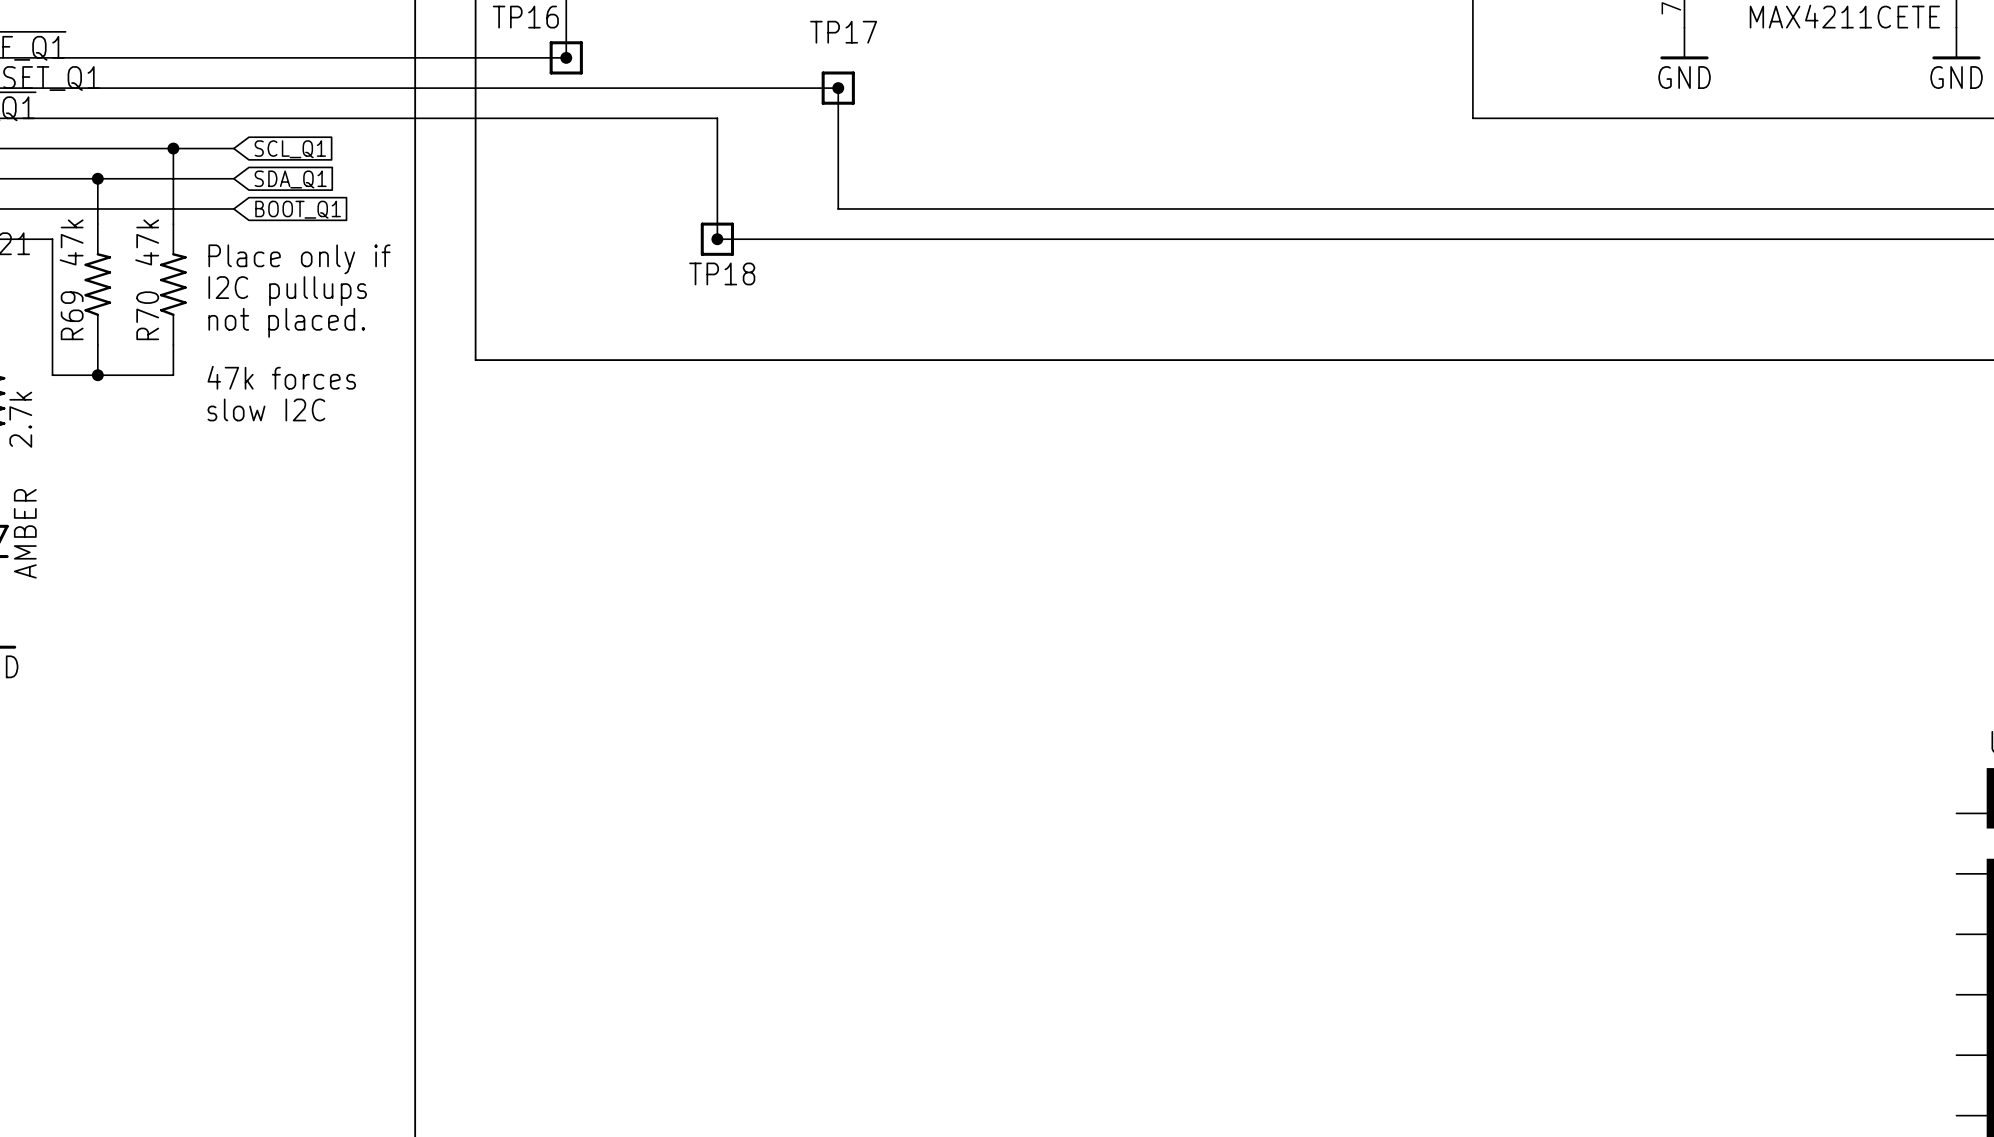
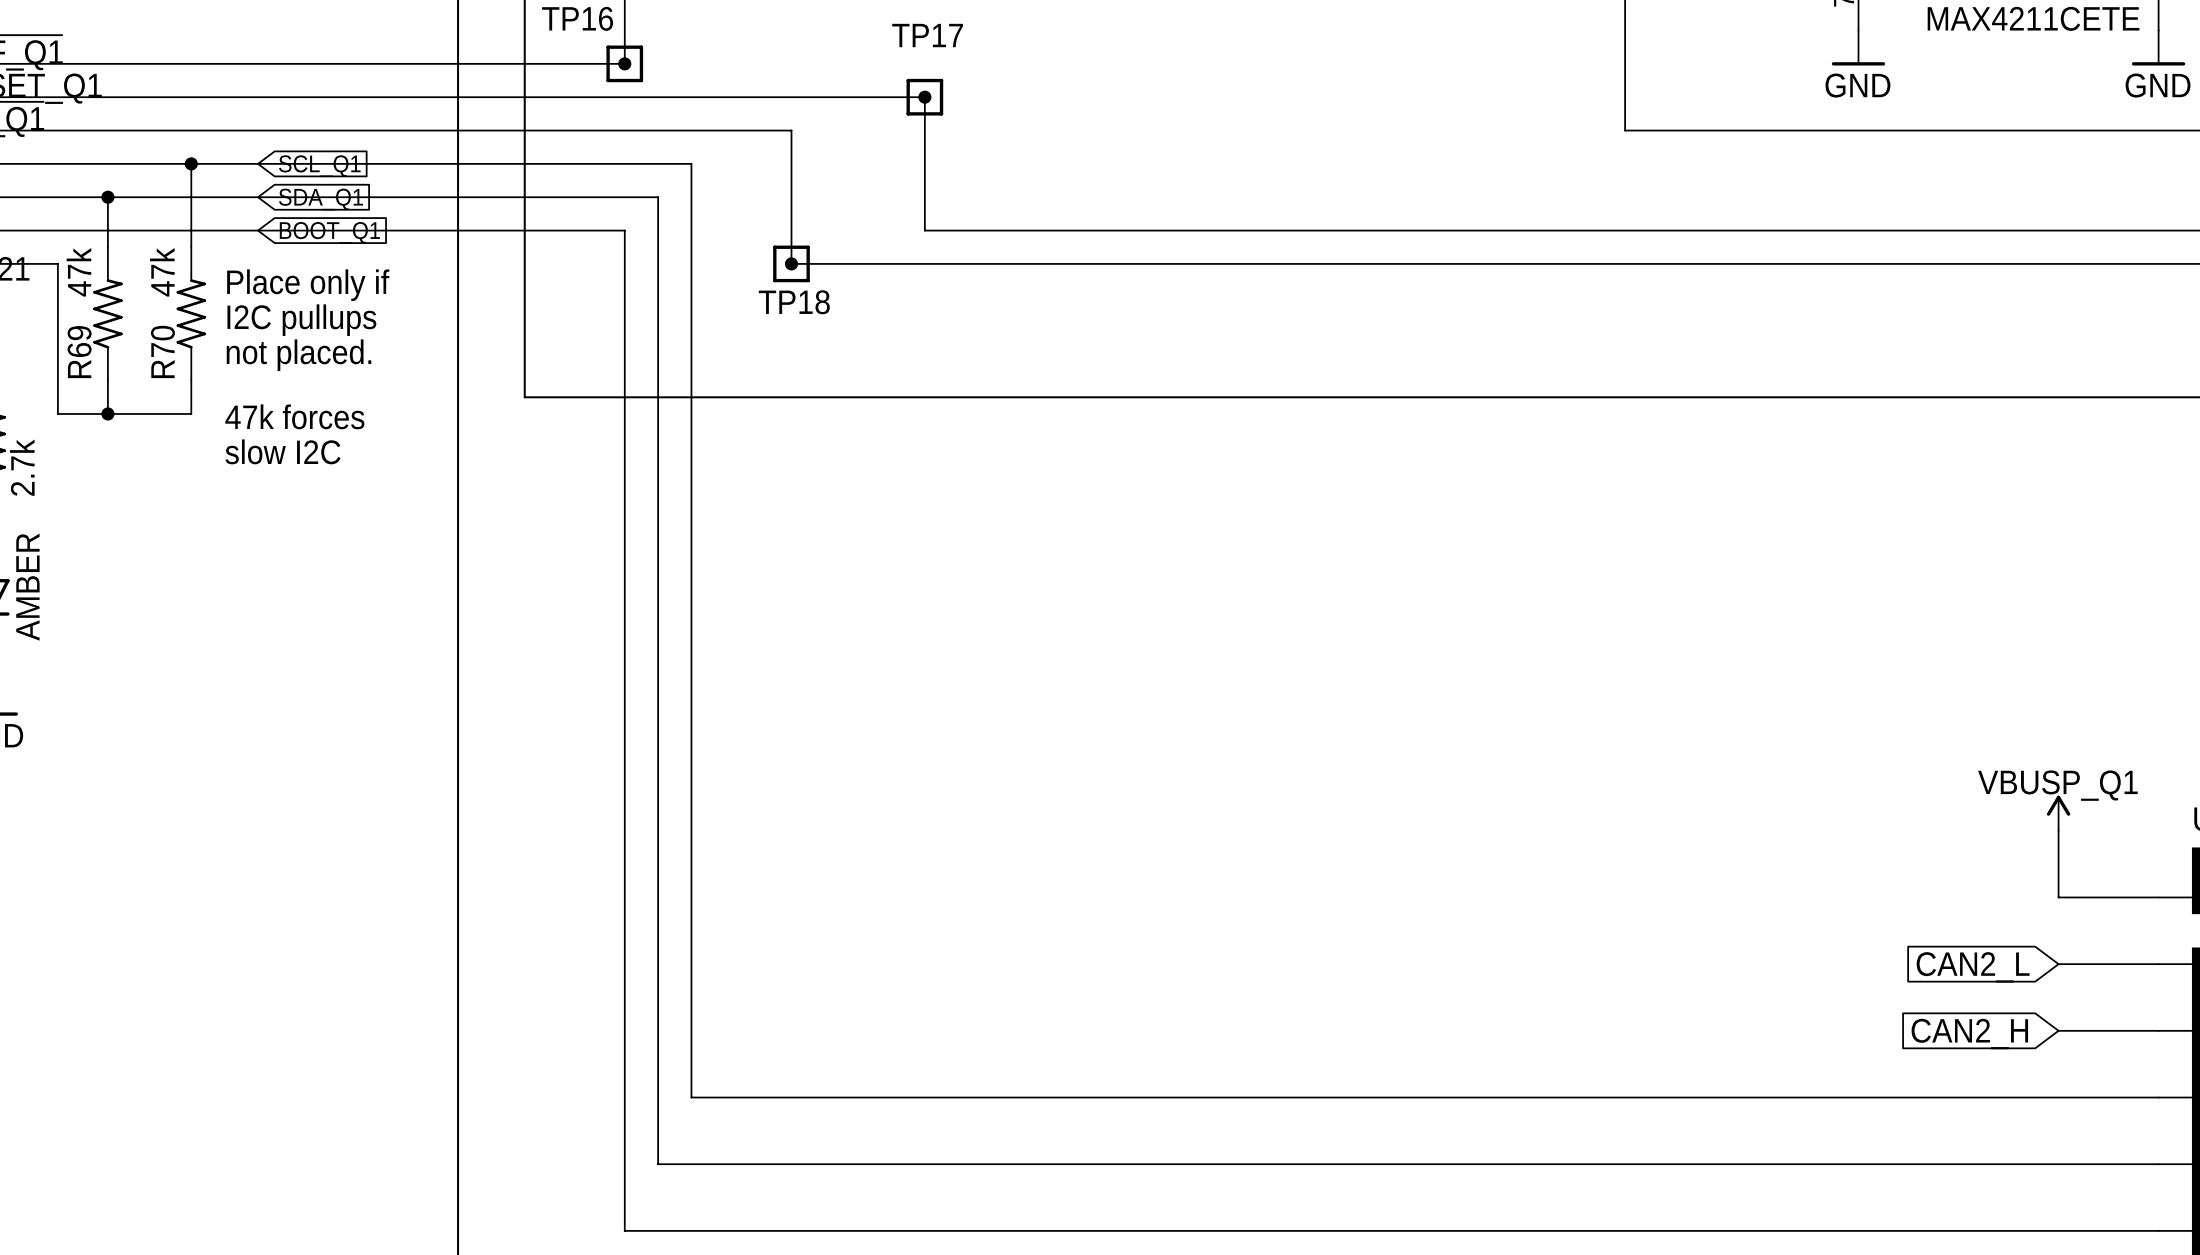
wire: none -> (257, 163) (691, 163) (691, 1097) (2158, 1097)
wire: none -> (257, 197) (658, 197) (658, 1164) (2158, 1164)
wire: none -> (257, 230) (624, 230) (624, 1230) (2158, 1230)
power symbol: none -> VBUSP_Q1 (2058, 813)
wire: none -> (2058, 830) (2058, 897) (2158, 897)
wire: none -> (2058, 964) (2158, 964)
global label: none -> CAN2_L (1973, 967)
wire: none -> (2058, 1030) (2158, 1030)
global label: none -> CAN2_H (1969, 1034)

